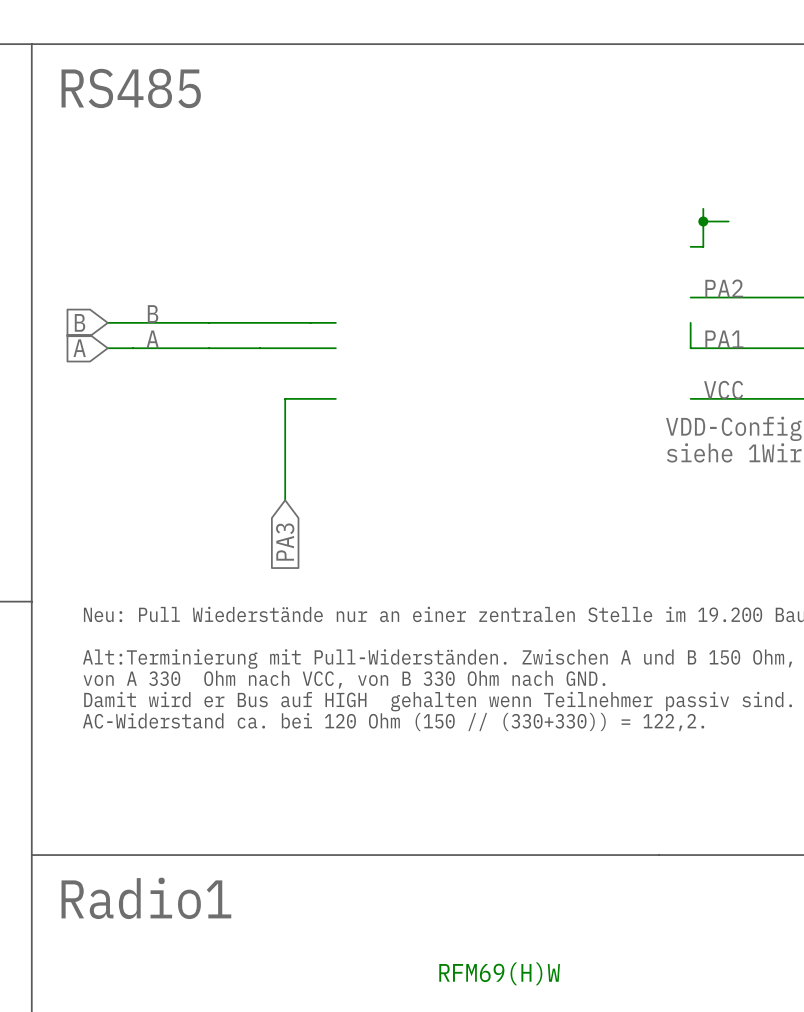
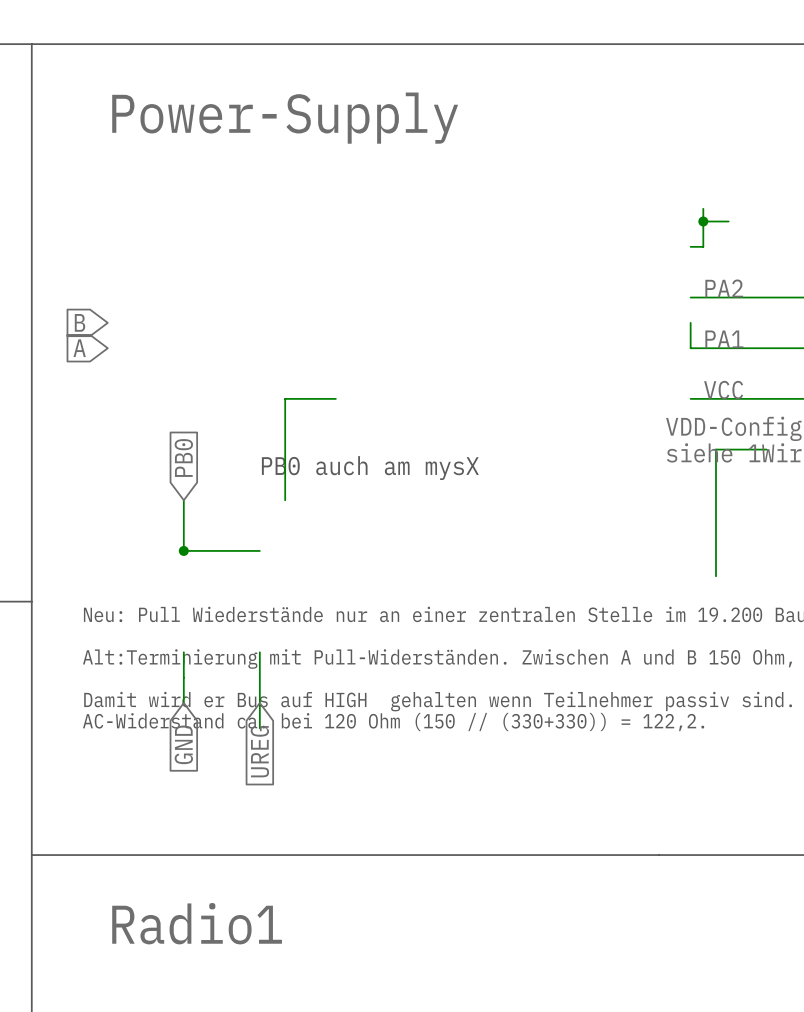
text: RS485 (131, 88) -> none
text: none -> Power-Supply (285, 118)
label: B (153, 314) -> none
wire: (107, 322) (335, 322) -> none
label: A (152, 339) -> none
wire: (107, 348) (335, 348) -> none
wire: none -> (766, 449) (715, 449) (715, 576)
global label: none -> PB0 (183, 458)
text: none -> PB0 auch am mysX (370, 468)
wire: none -> (183, 500) (183, 550) (259, 550)
global label: PA3 (285, 542) -> none
junction: none -> (183, 550)
wire: none -> (183, 652) (183, 703)
wire: none -> (259, 652) (259, 728)
text: von A 330 Ohm nach VCC, von B 330 Ohm nach GND. (344, 679) -> none
global label: none -> GND (183, 744)
global label: none -> UREG (259, 751)
text position: Radio1 (146, 898) -> Radio1 (197, 923)
text: RFM69(H)W (499, 973) -> none

